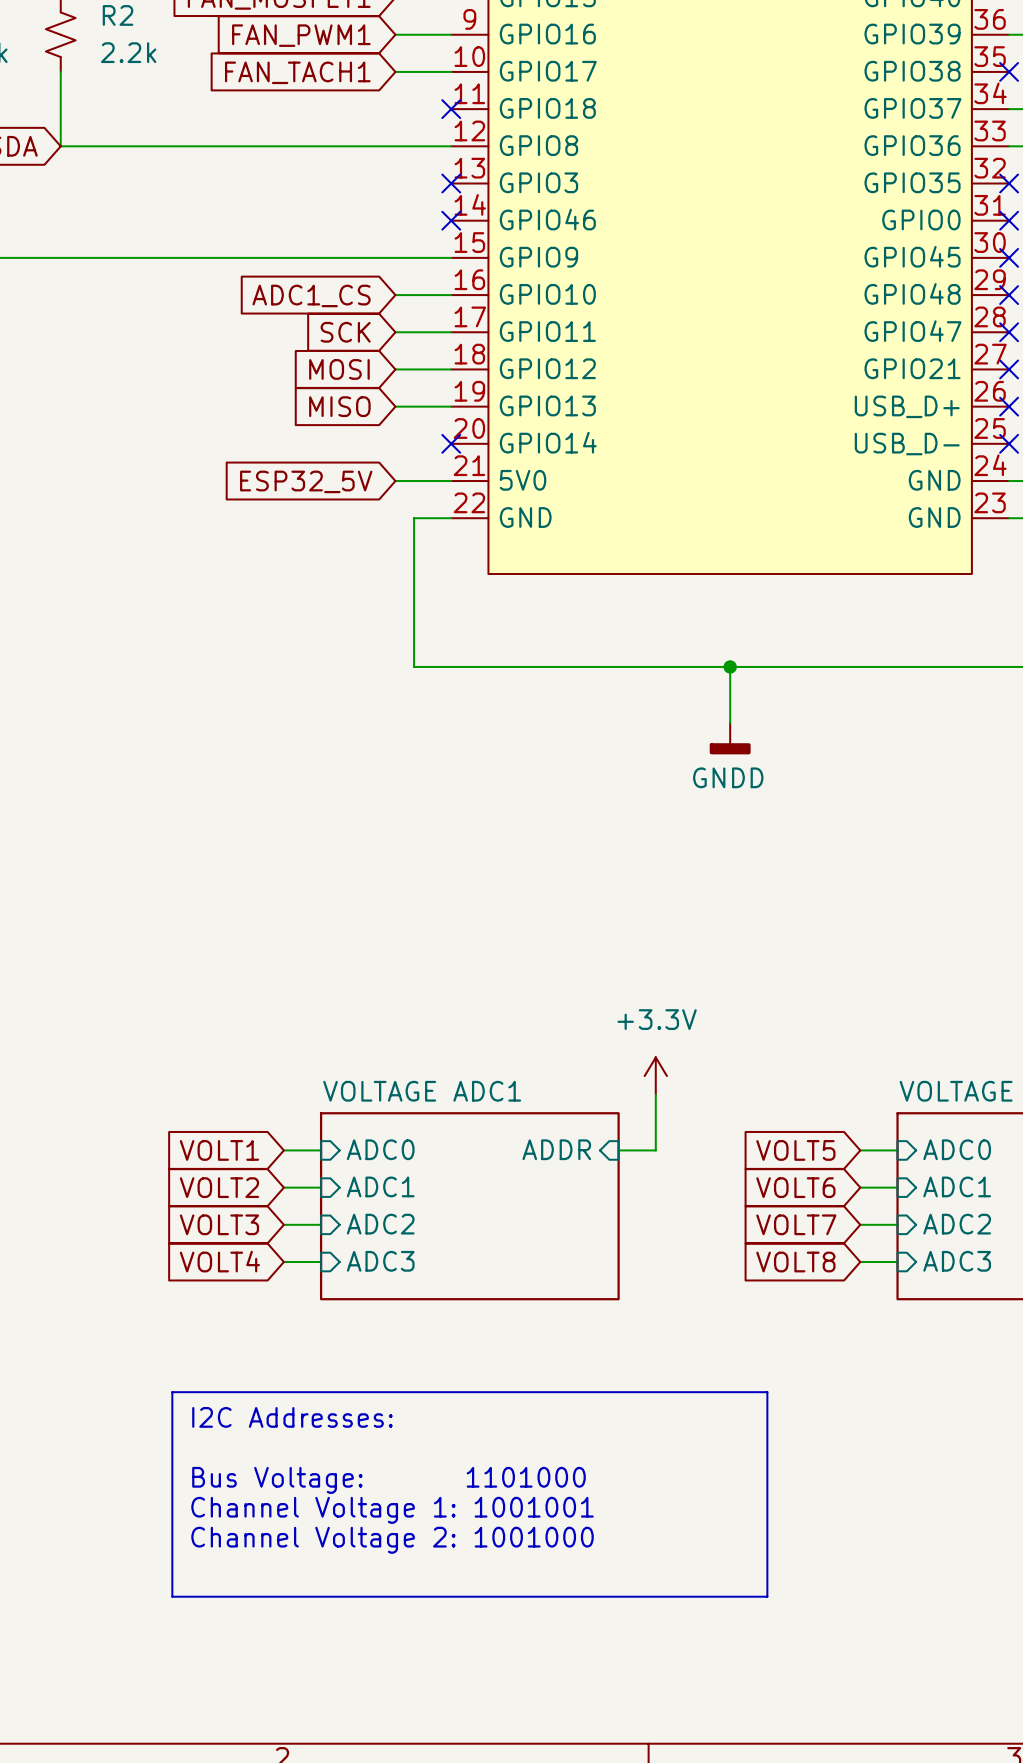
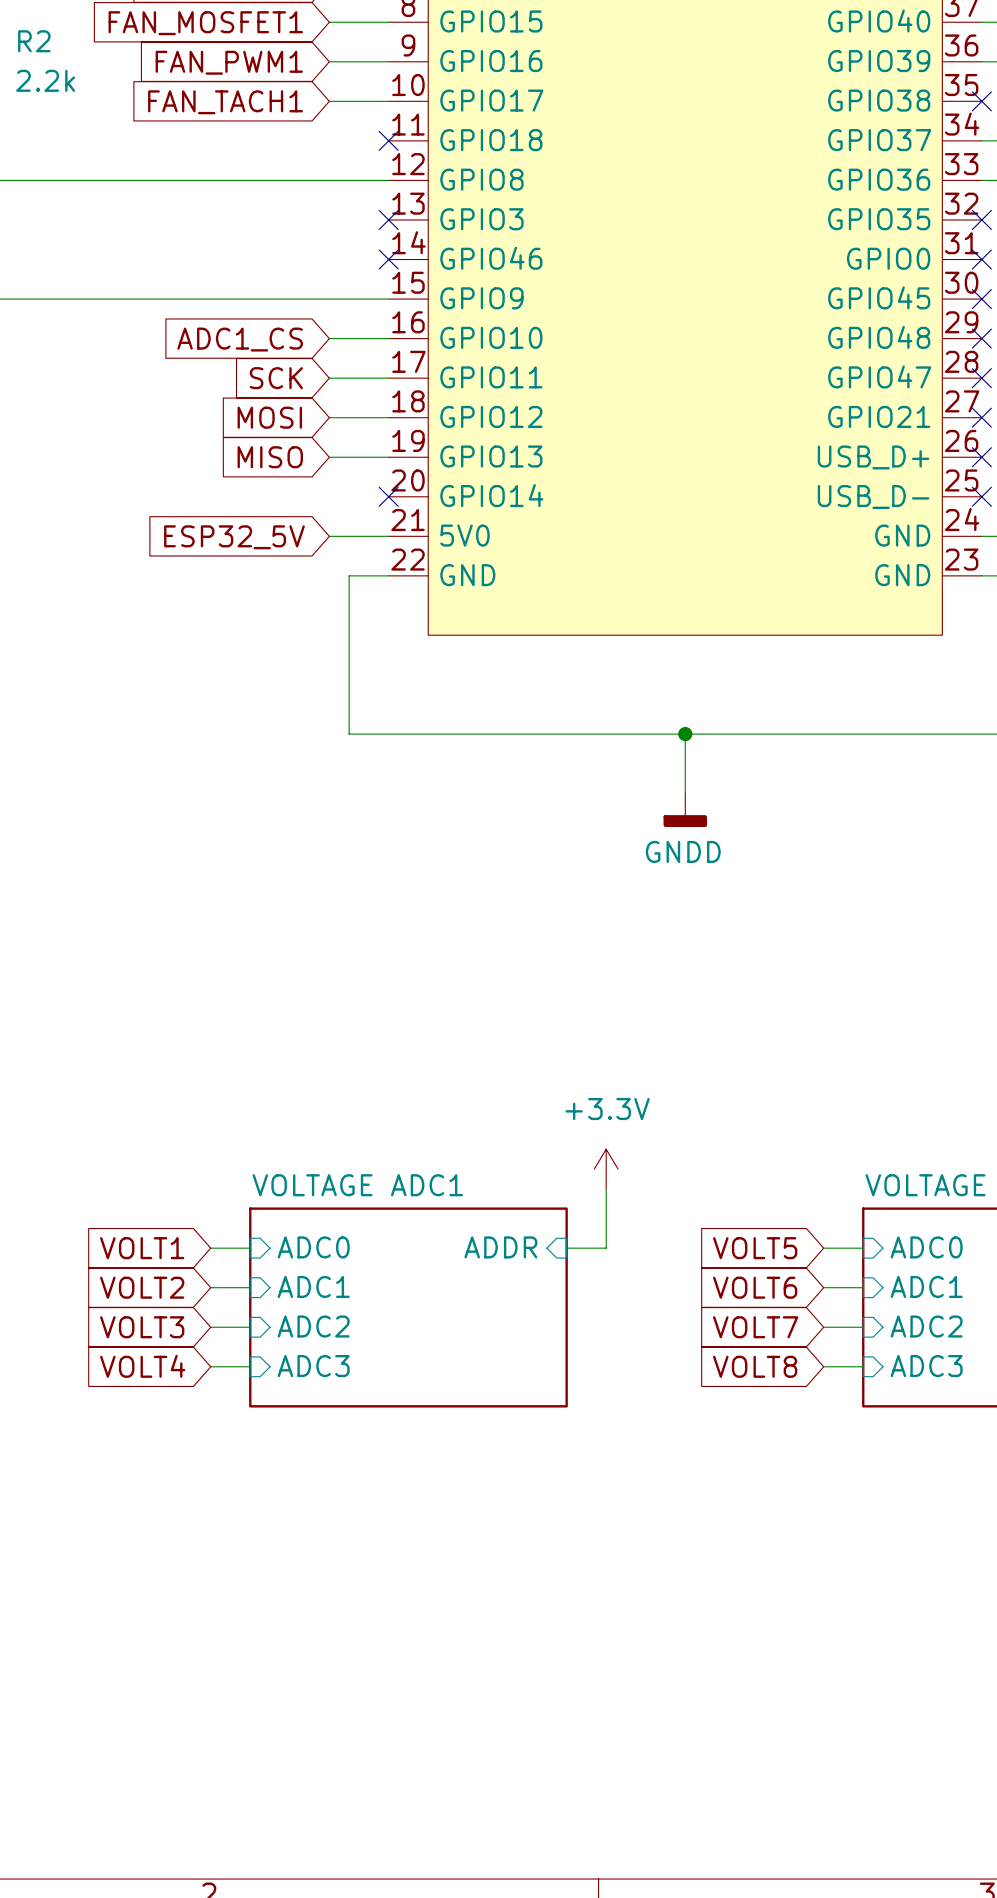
line: (172, 1392) (767, 1392) (767, 1596) (172, 1596) (172, 1392) -> none
text: I2C Addresses: (292, 1417) -> none
text: Bus Voltage: 1101000 (388, 1480) -> none
text: Channel Voltage 1: 1001001 (392, 1510) -> none
text: Channel Voltage 2: 1001000 (392, 1540) -> none

